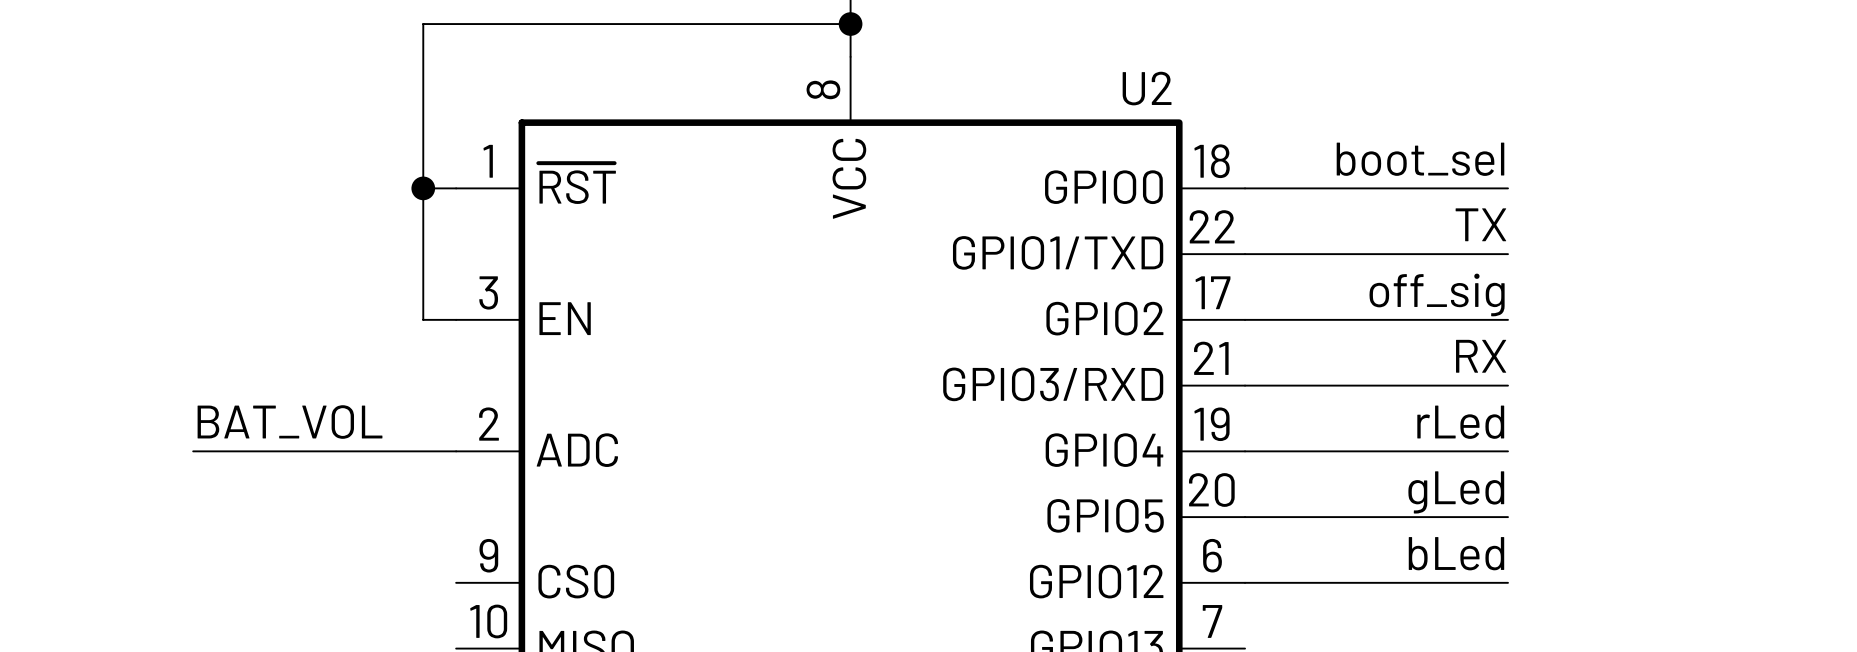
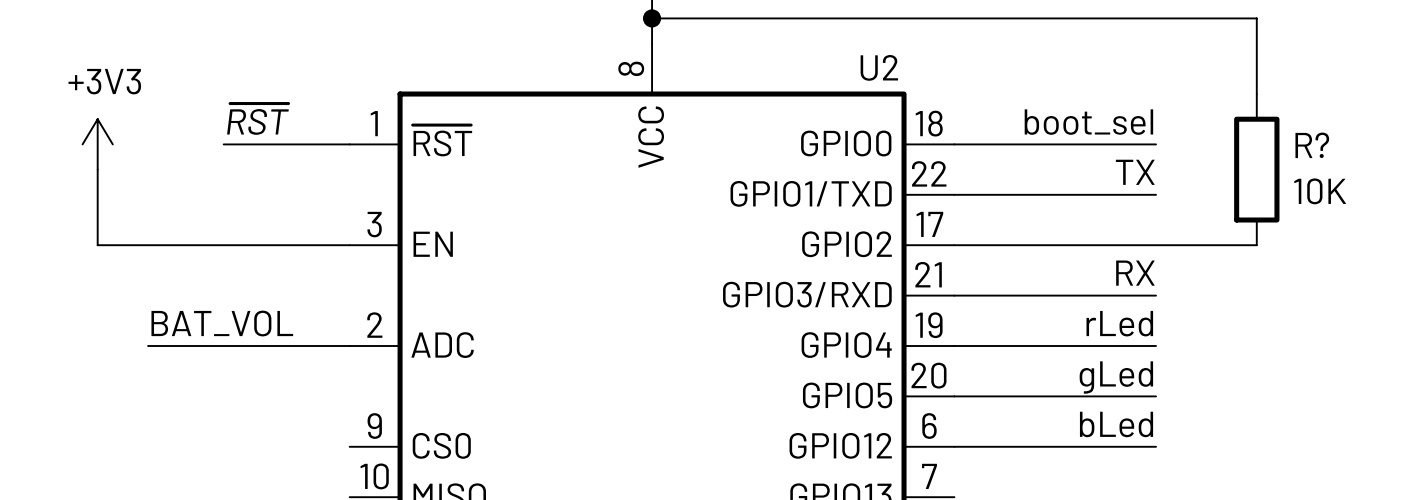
wire: (850, 24) (423, 24) (423, 319) -> (97, 169) (97, 245) (324, 245)
wire: none -> (652, 18) (1256, 18) (1256, 94)
label: none -> ~{RST} (257, 119)
power symbol: none -> +3V3 (97, 144)
wire: none -> (223, 144) (324, 144)
junction: (423, 188) -> none
R?: none -> 10K (1256, 169)
label: off_sig (1437, 294) -> none
wire: none -> (1156, 245) (1256, 245)

